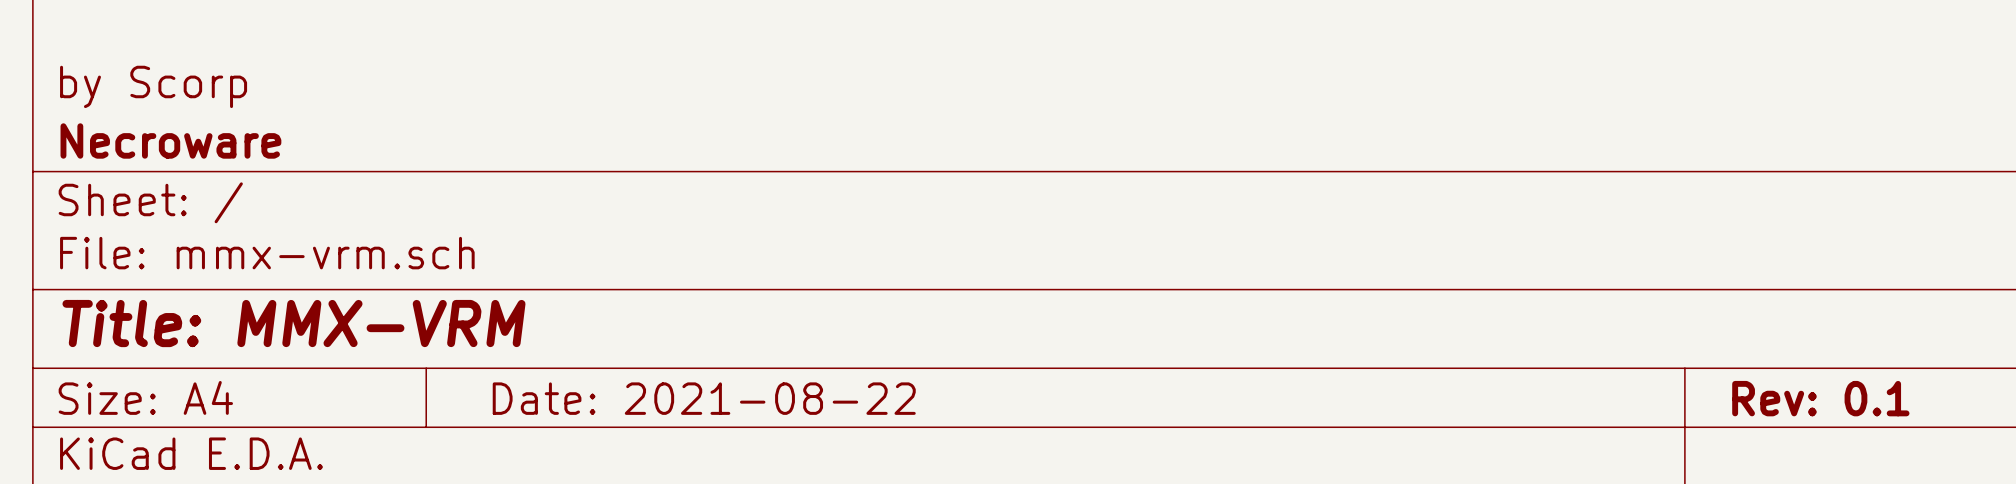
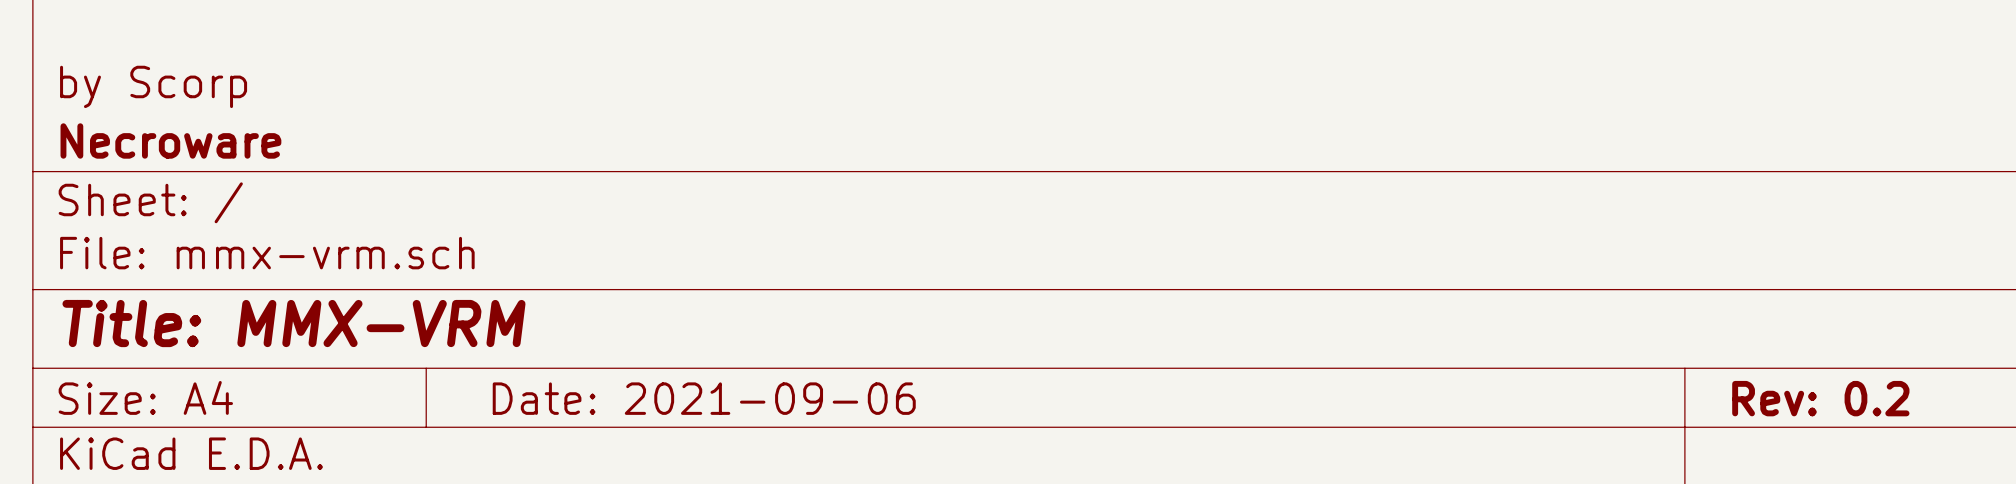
title block: Date: 2021-08-22 (704, 398) -> Date: 2021-09-06 (704, 398)
title block: Rev: 0.1 (1820, 398) -> Rev: 0.2 (1820, 398)

